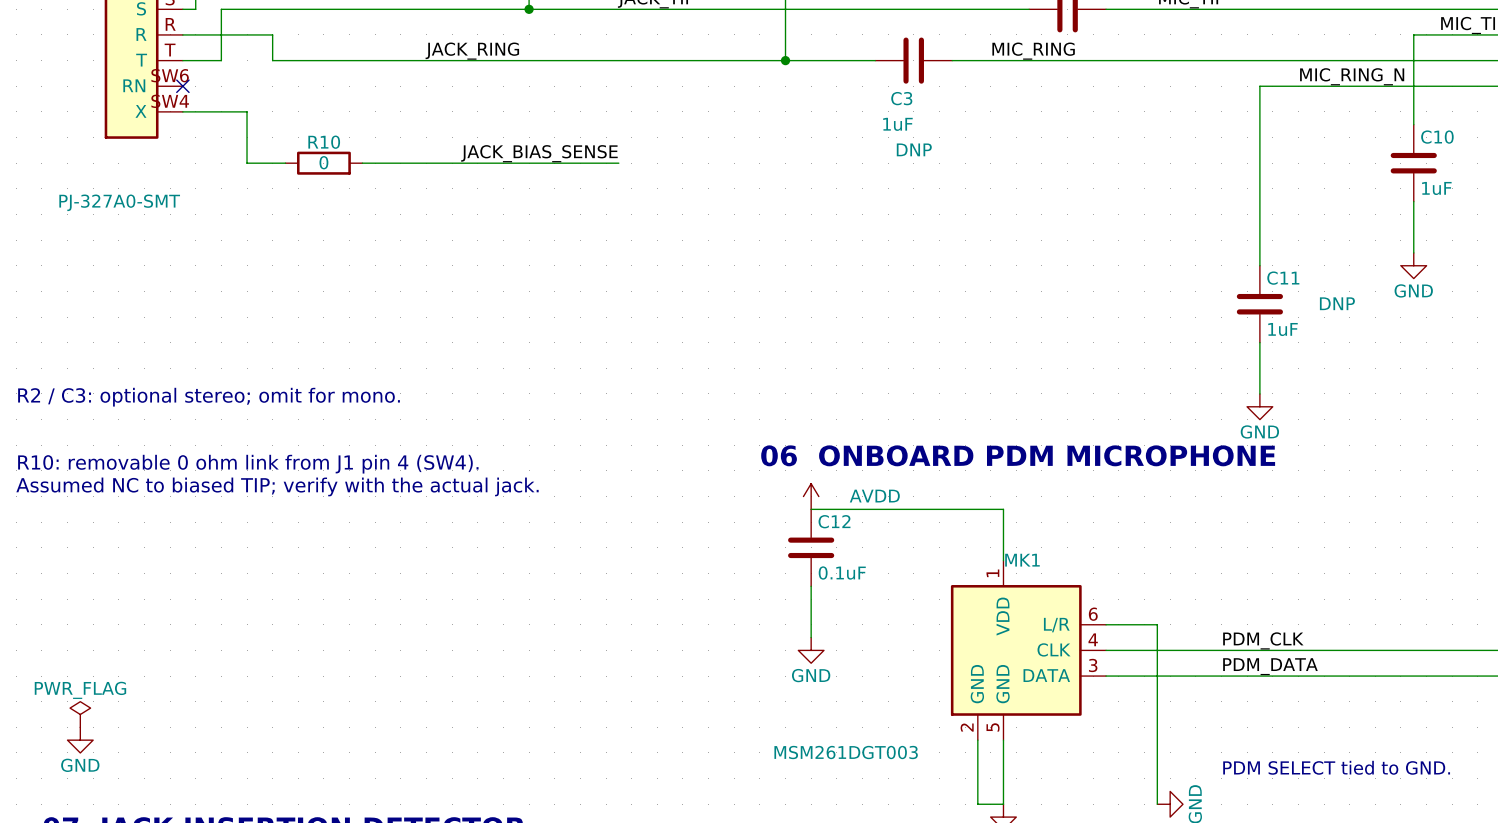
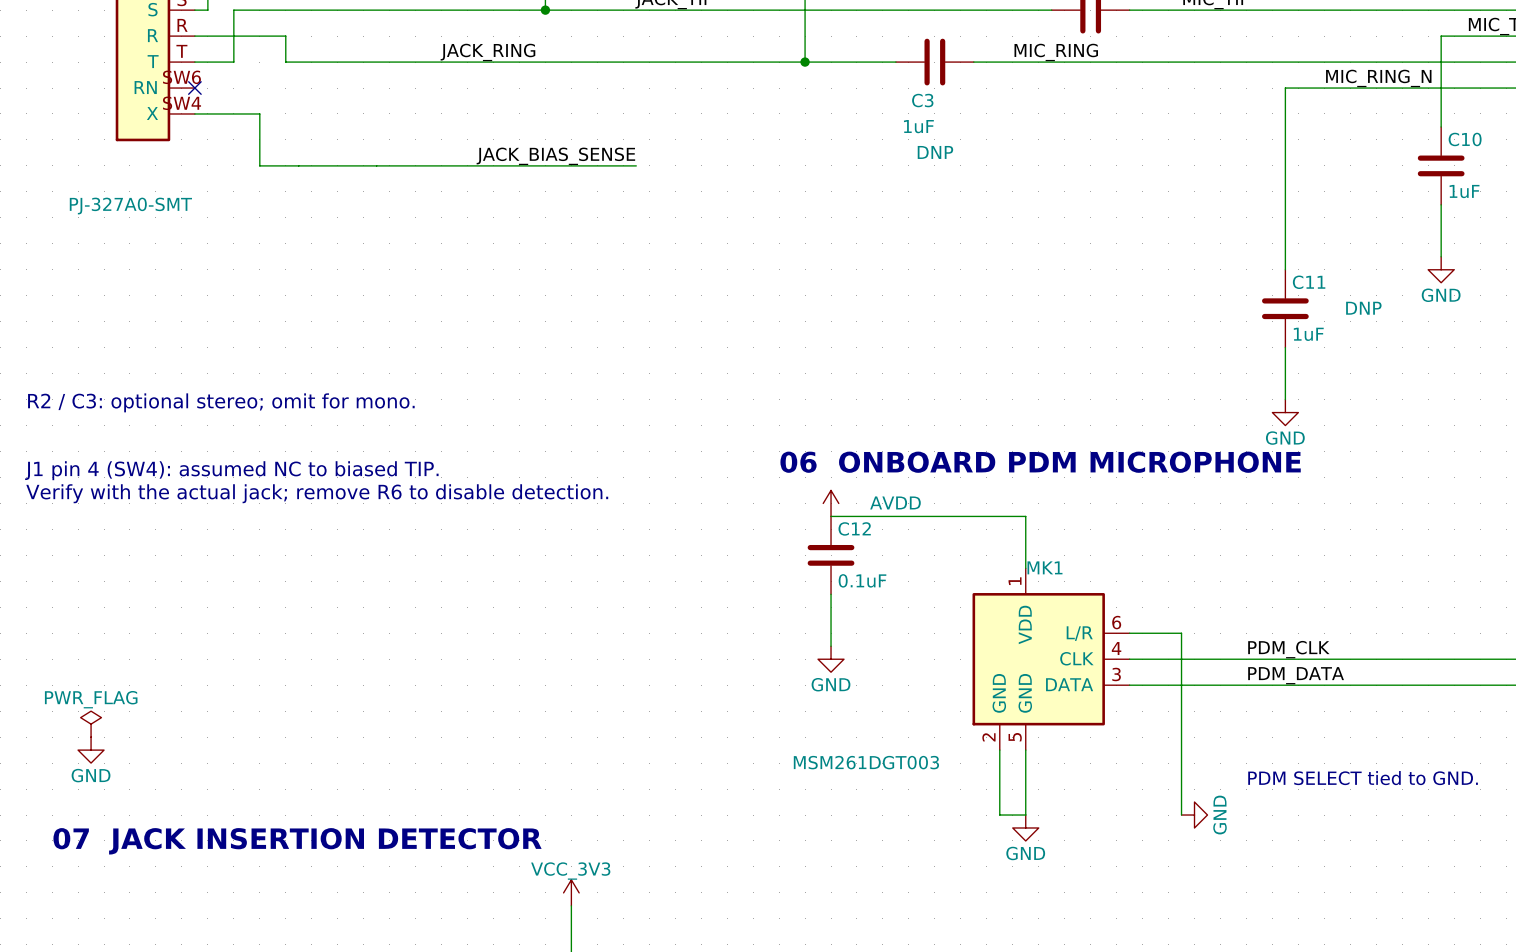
wire: none -> (298, 165) (376, 165)
R10: 0 (323, 163) -> none
text: R10: removable 0 ohm link from J1 pin 4 (SW4). (248, 464) -> J1 pin 4 (SW4): assumed NC to biased TIP. (231, 470)
text: Assumed NC to biased TIP; verify with the actual jack. (277, 486) -> Verify with the actual jack; remove R6 to disable detection. (317, 493)

